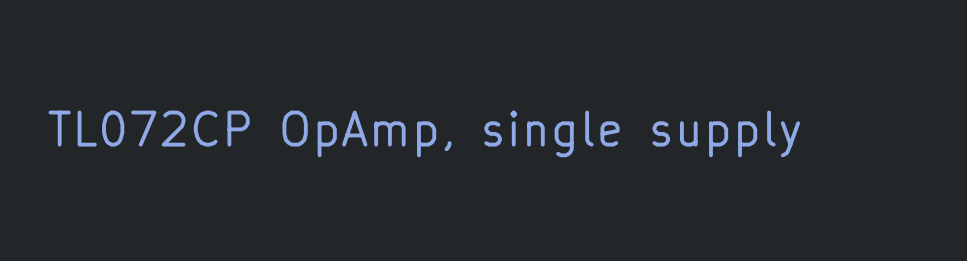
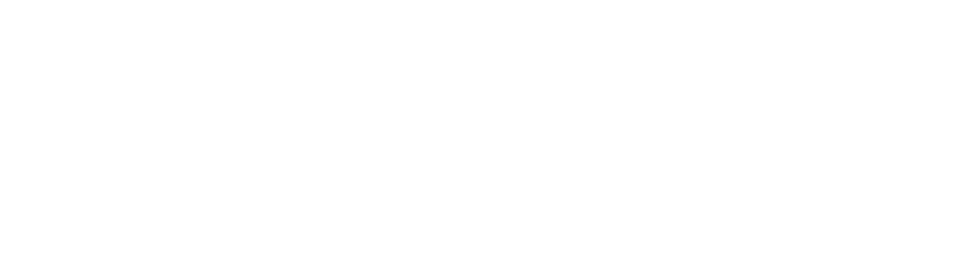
text: TL072CP OpAmp, single supply (424, 133) -> none

